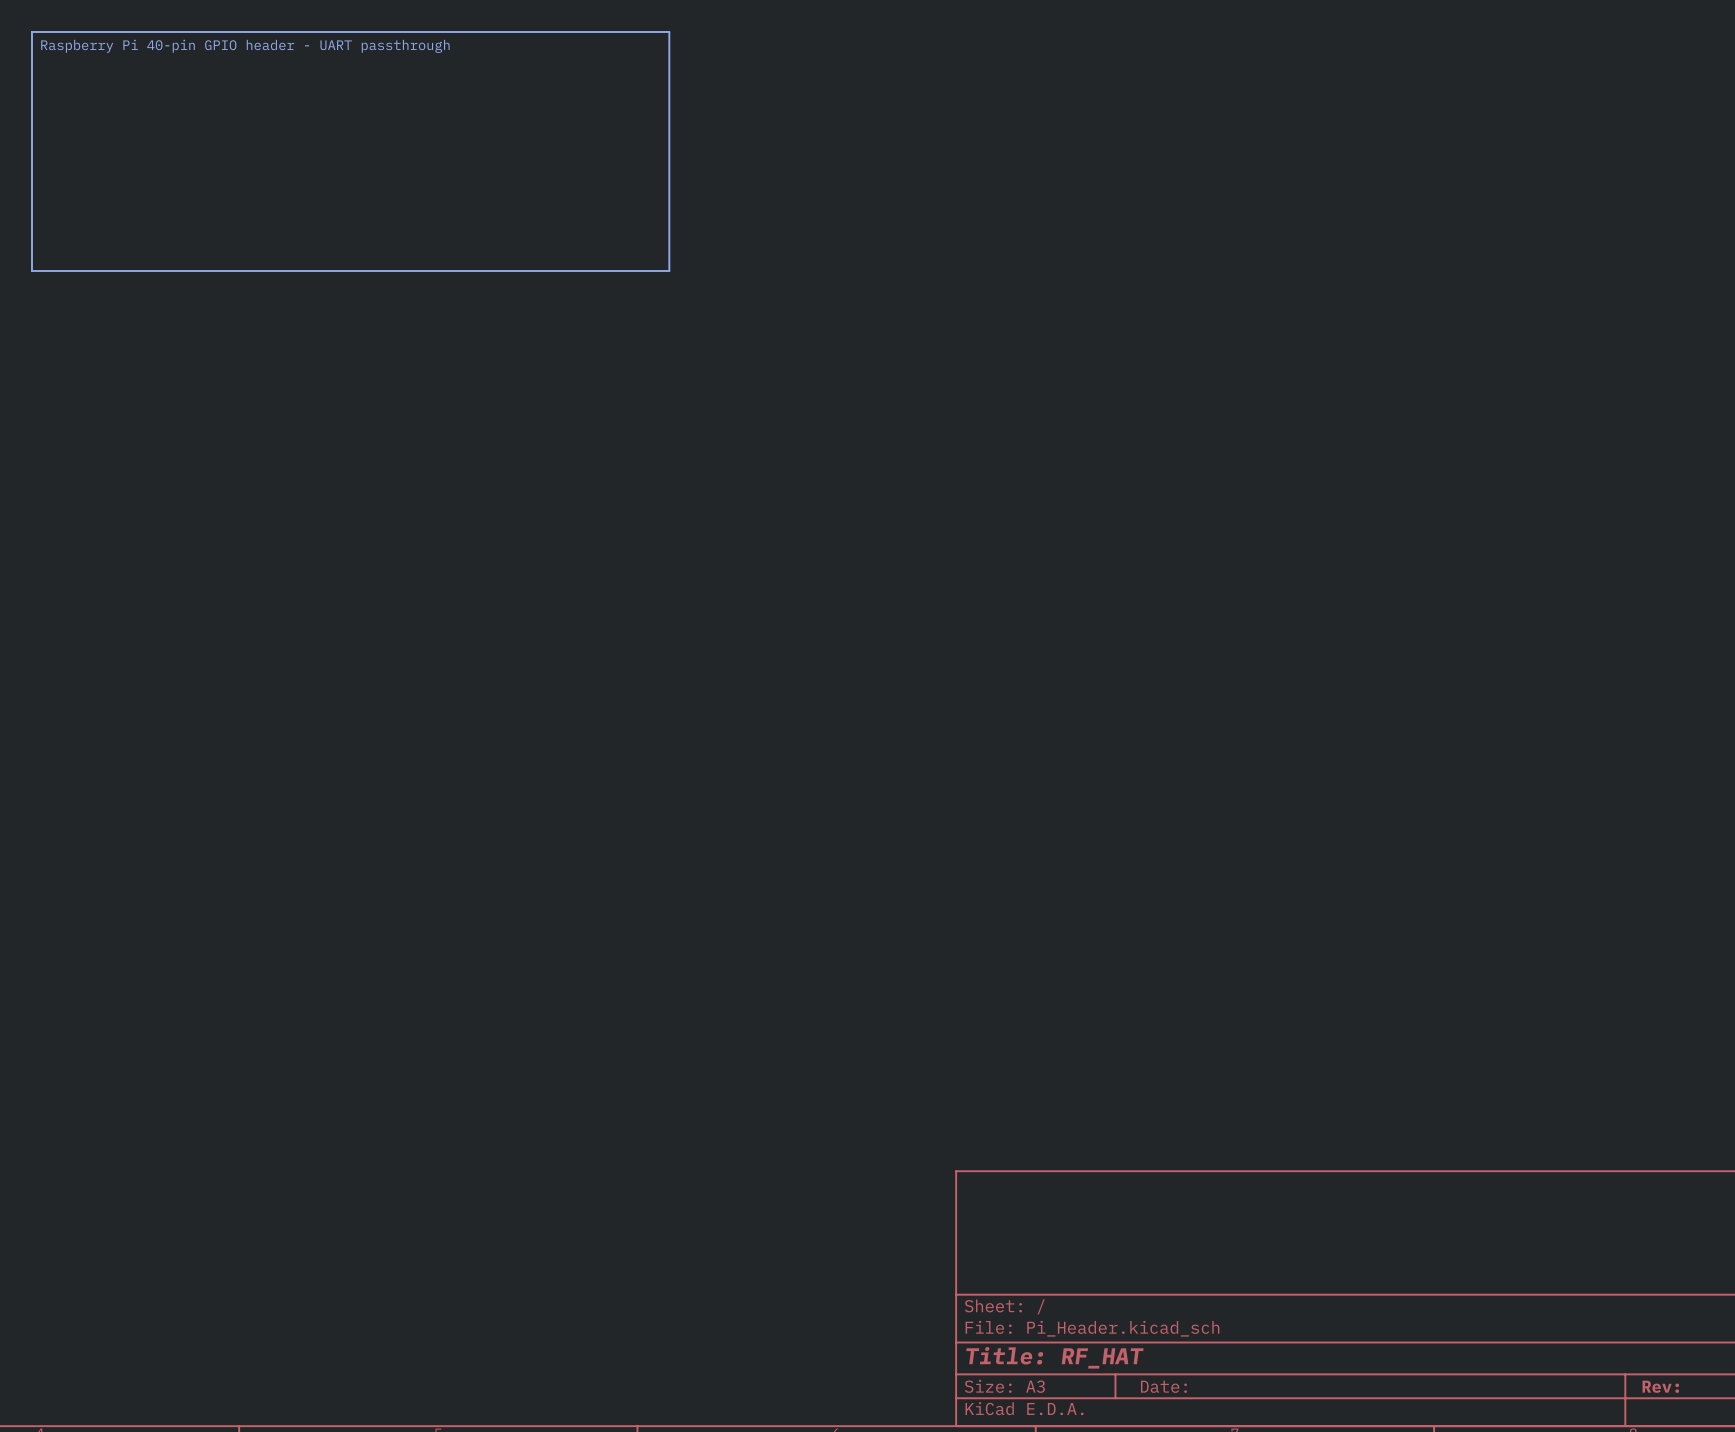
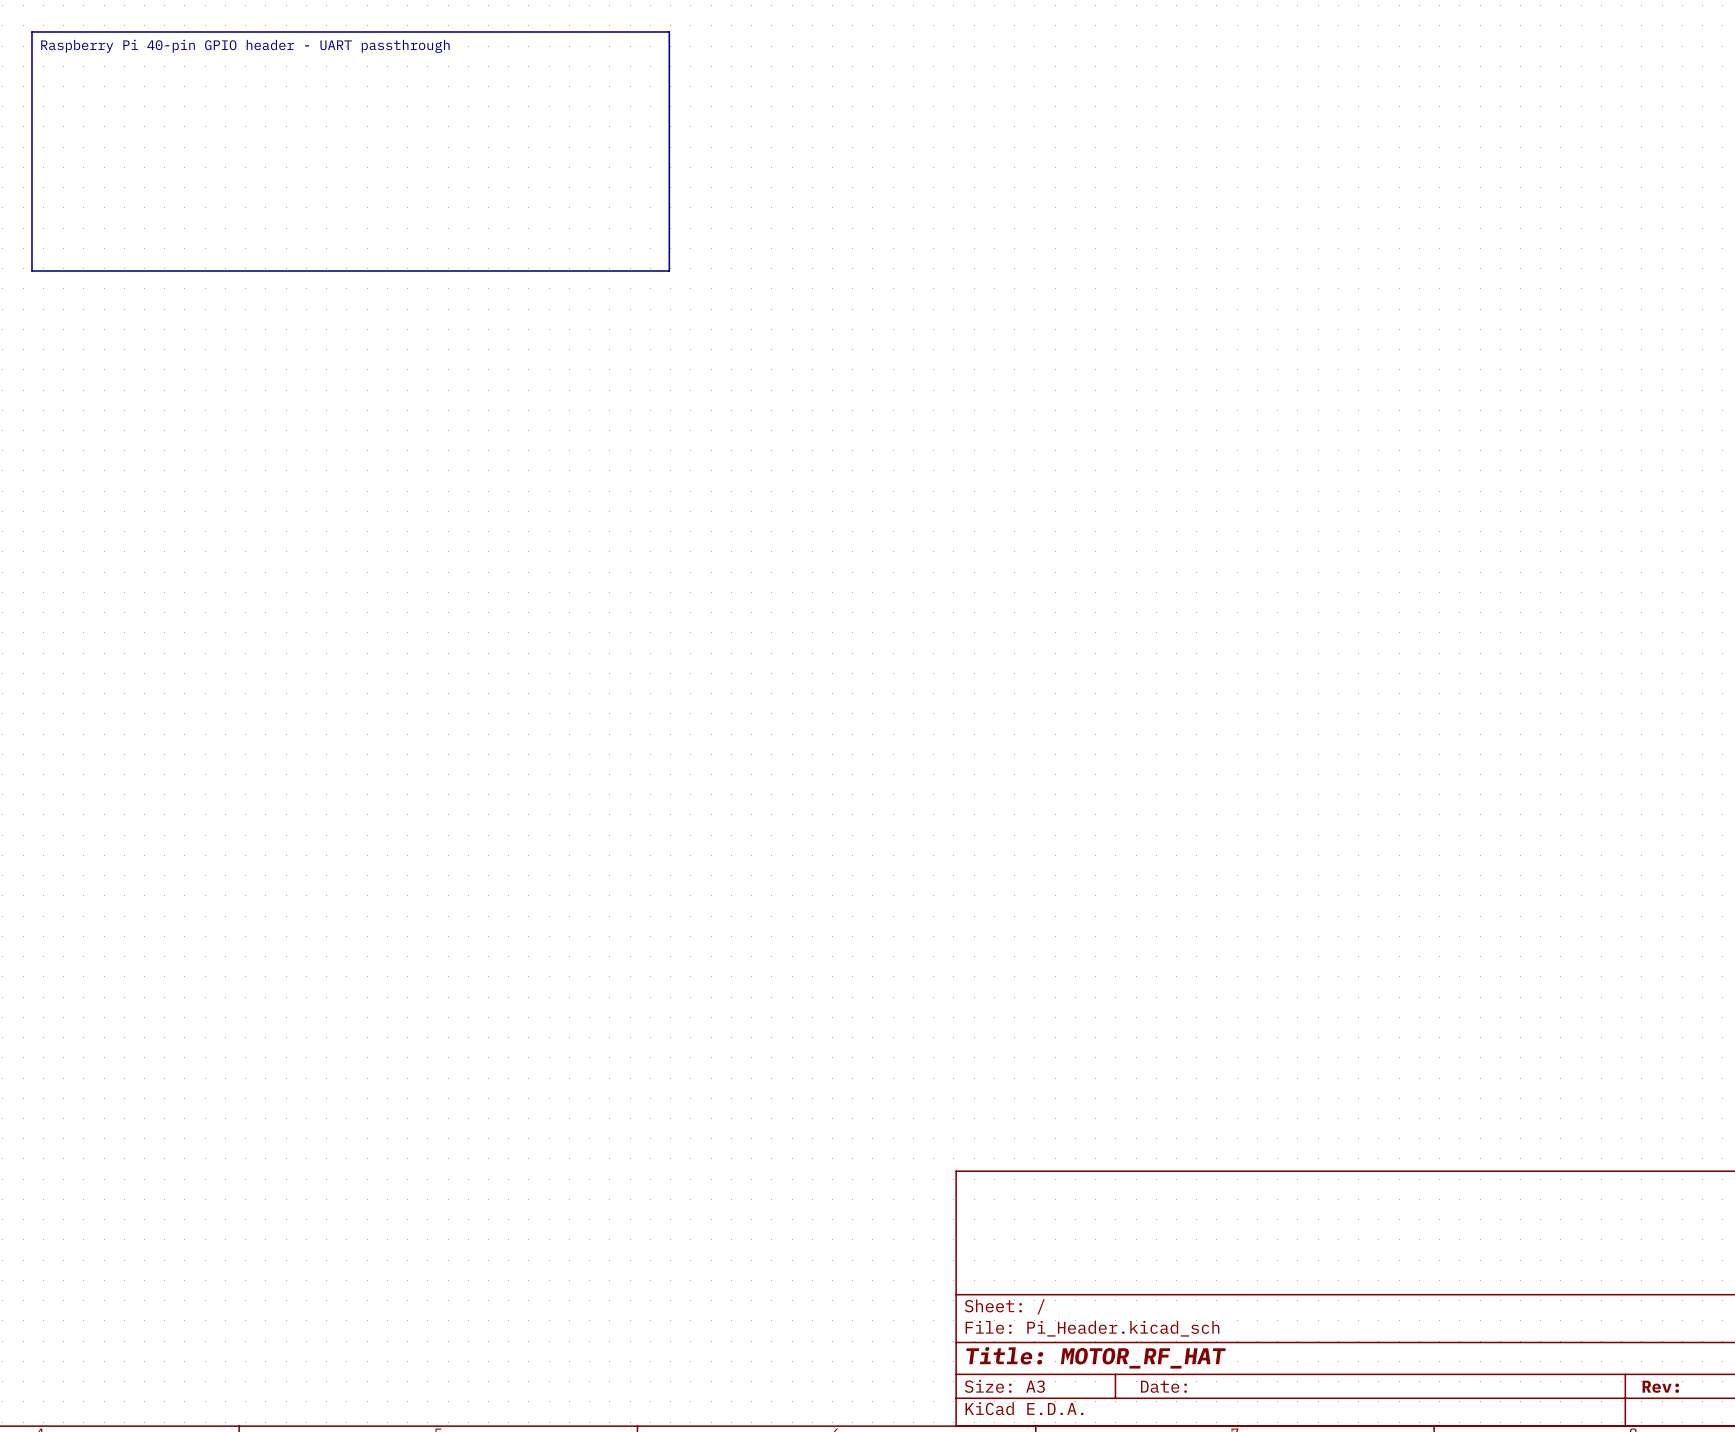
title block: Title: RF_HAT (1054, 1357) -> Title: MOTOR_RF_HAT (1096, 1357)

